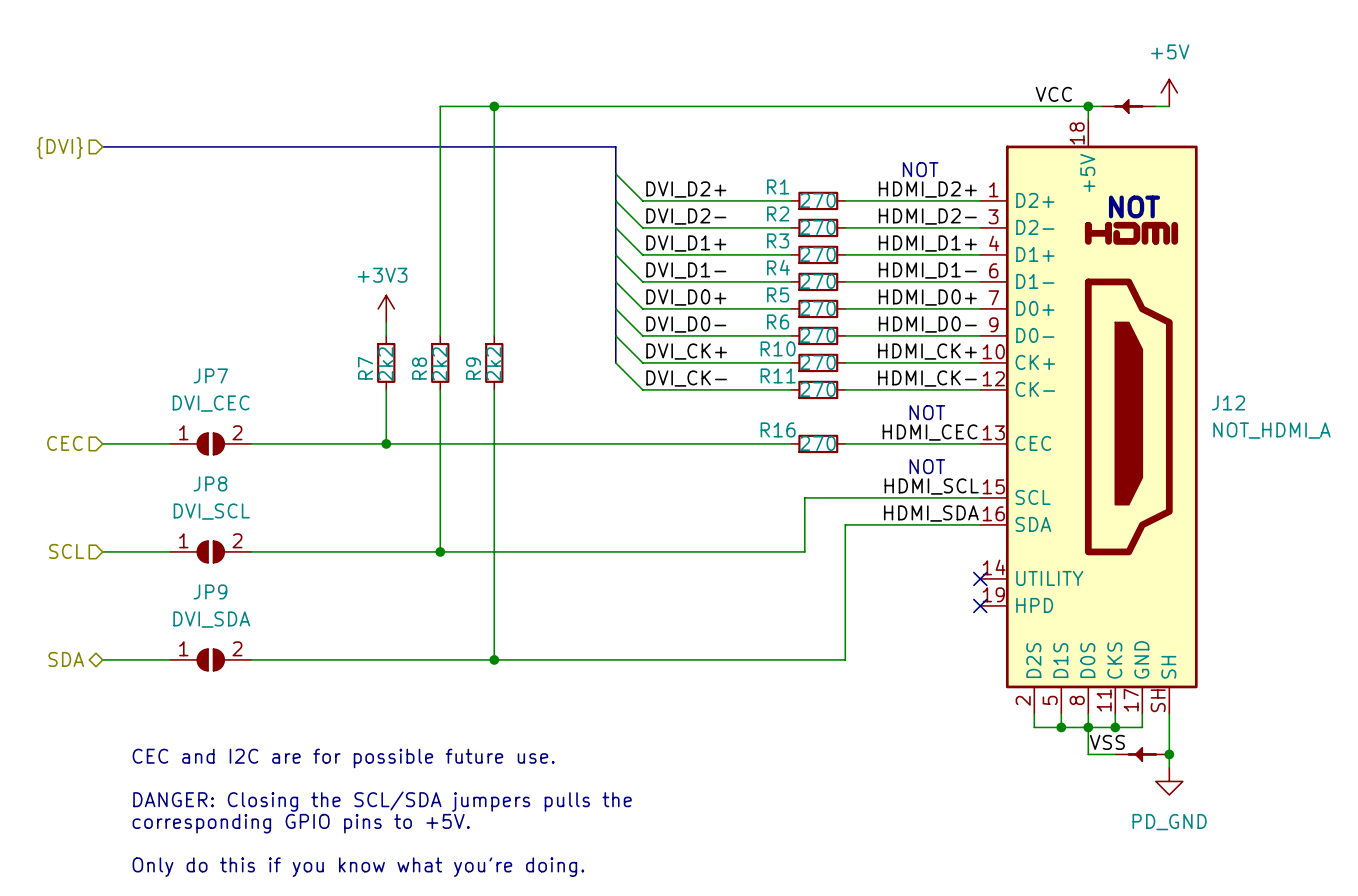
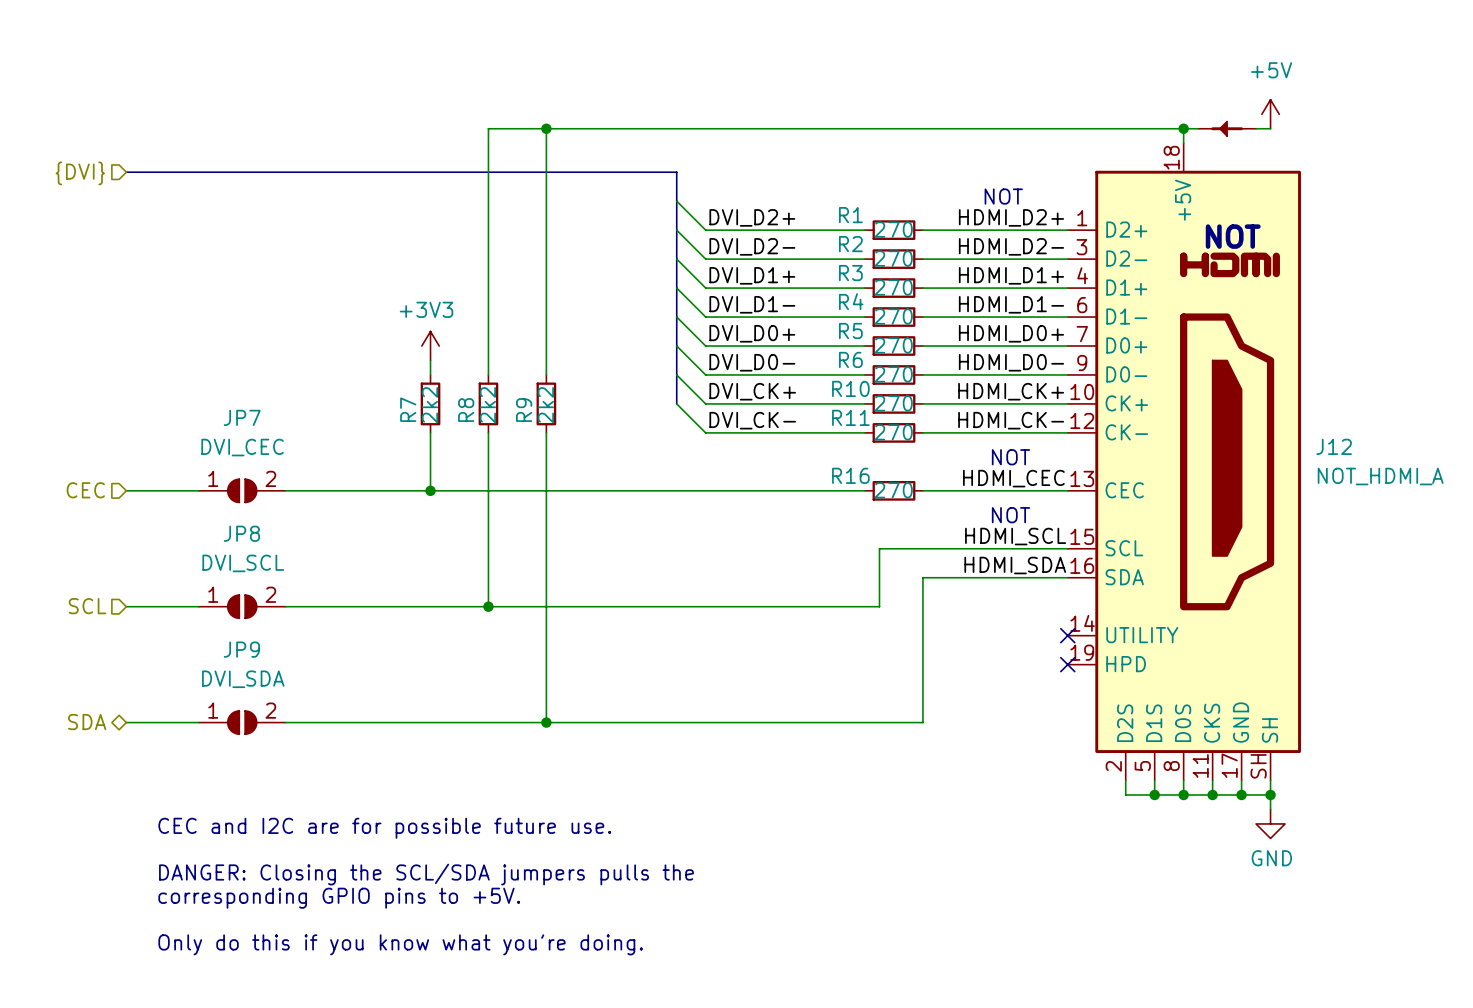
label: VCC (1053, 94) -> none
wire: (1088, 727) (1088, 754) (1115, 754) -> none
wire: none -> (1241, 794) (1270, 794)
junction: none -> (1241, 794)
junction: none -> (1270, 794)
label: VSS (1107, 742) -> none
part: (1142, 754) -> none
junction: (1169, 754) -> none
power symbol: none -> GND (1270, 823)
power symbol: PD_GND (1169, 781) -> none

